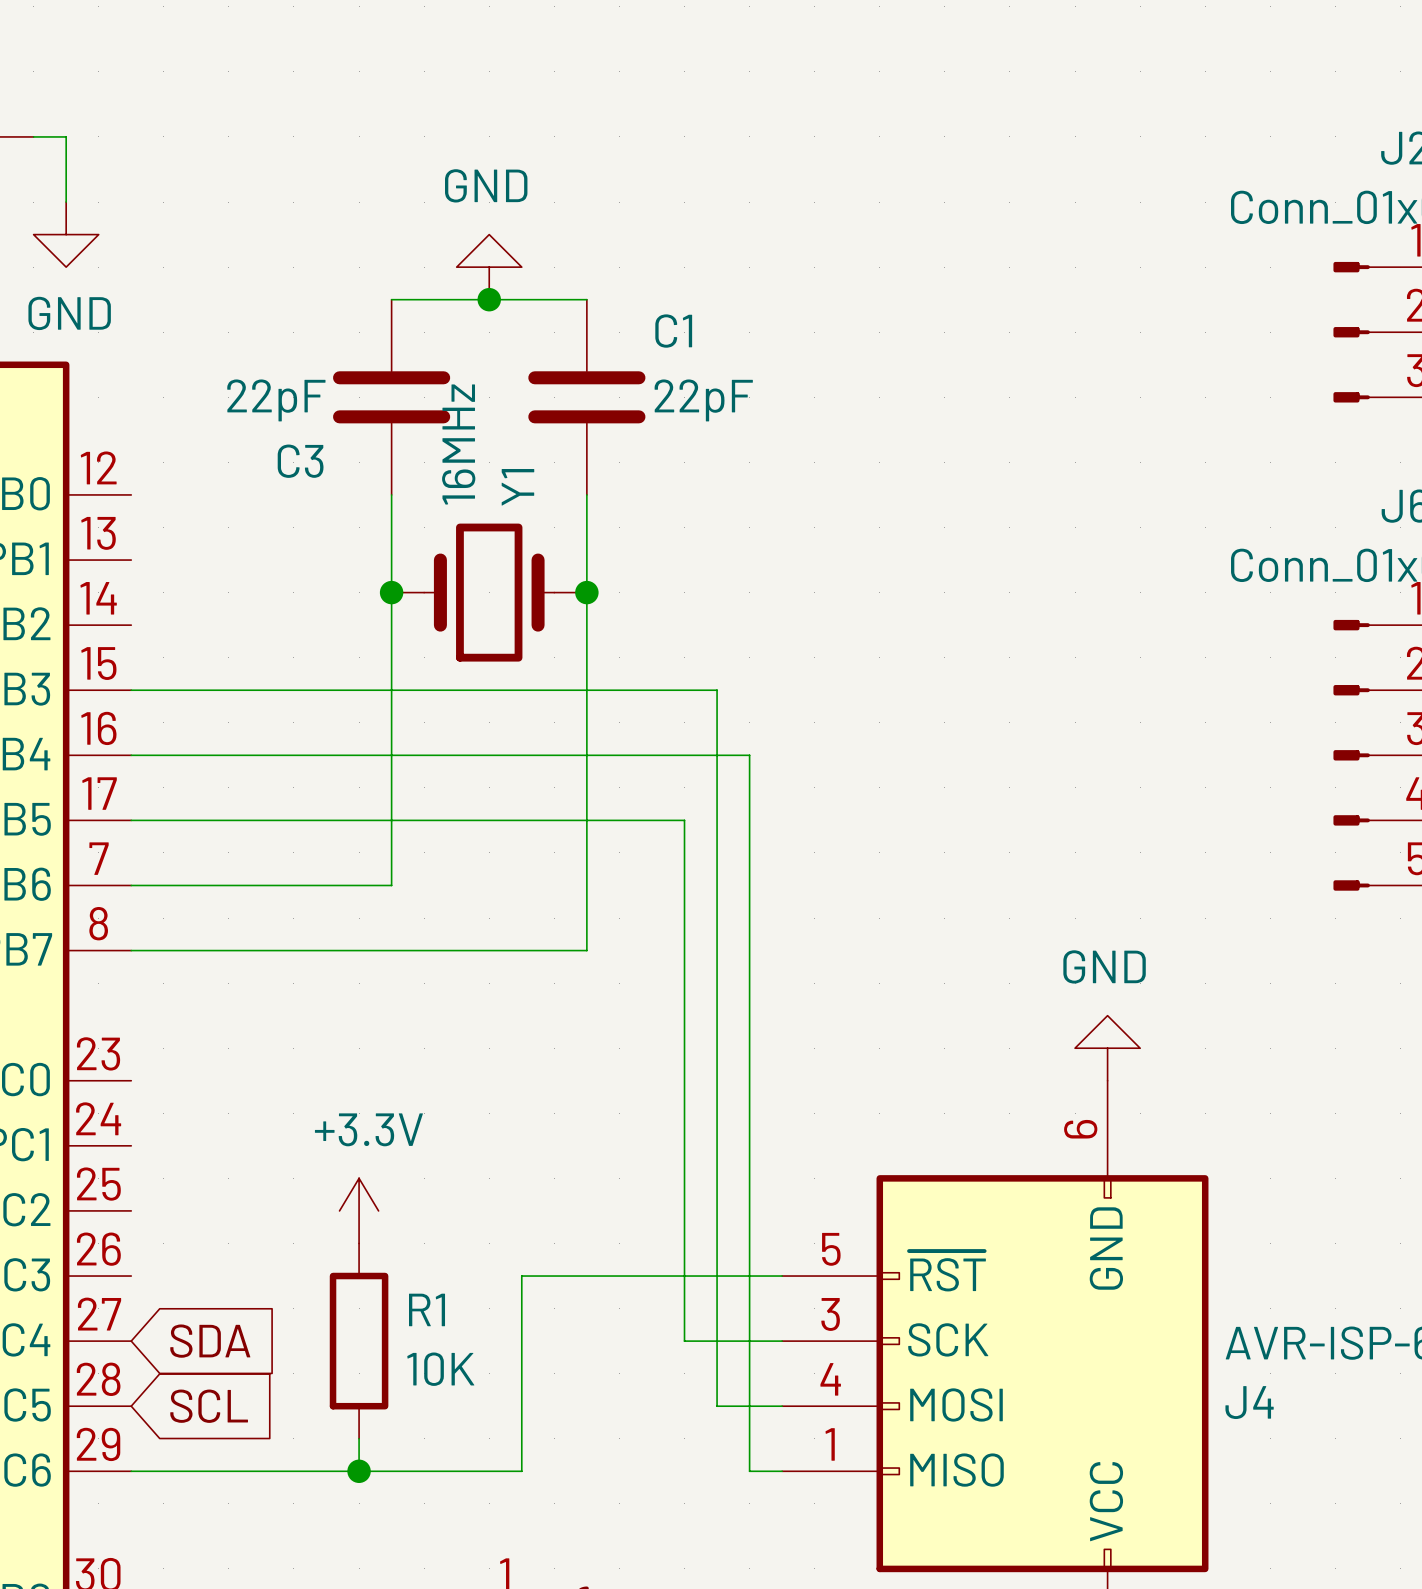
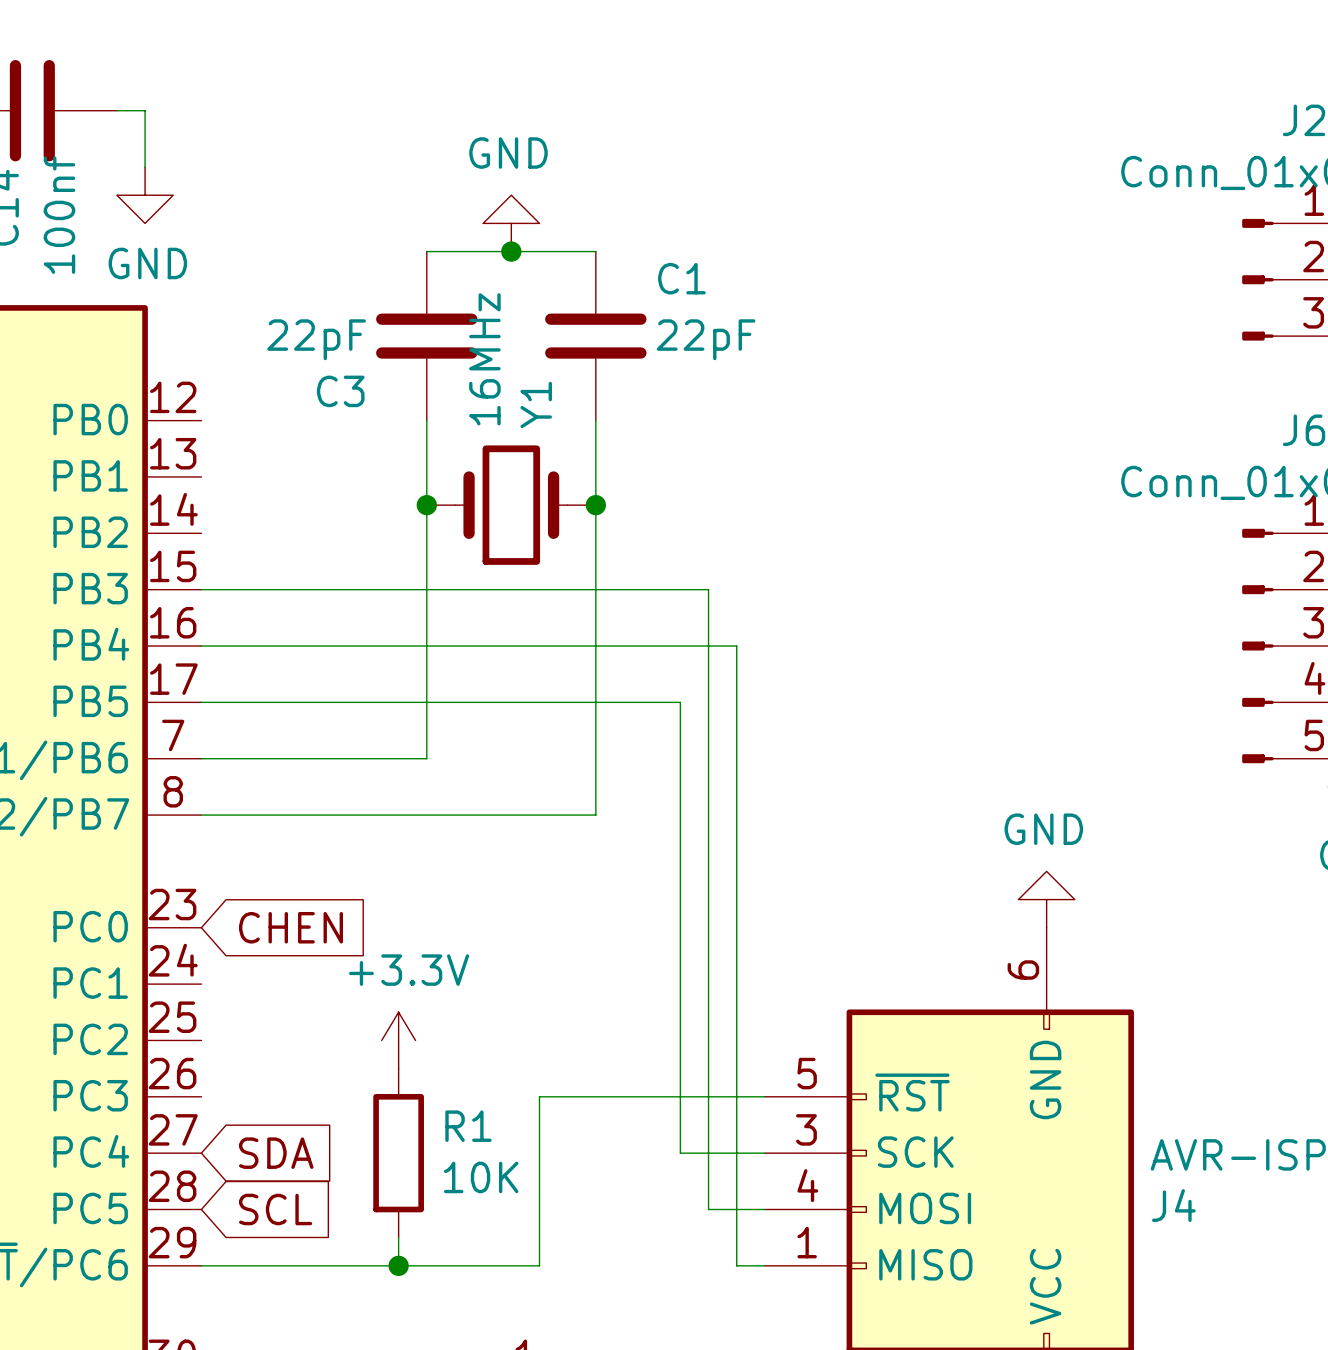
global label: none -> CHEN (291, 927)

